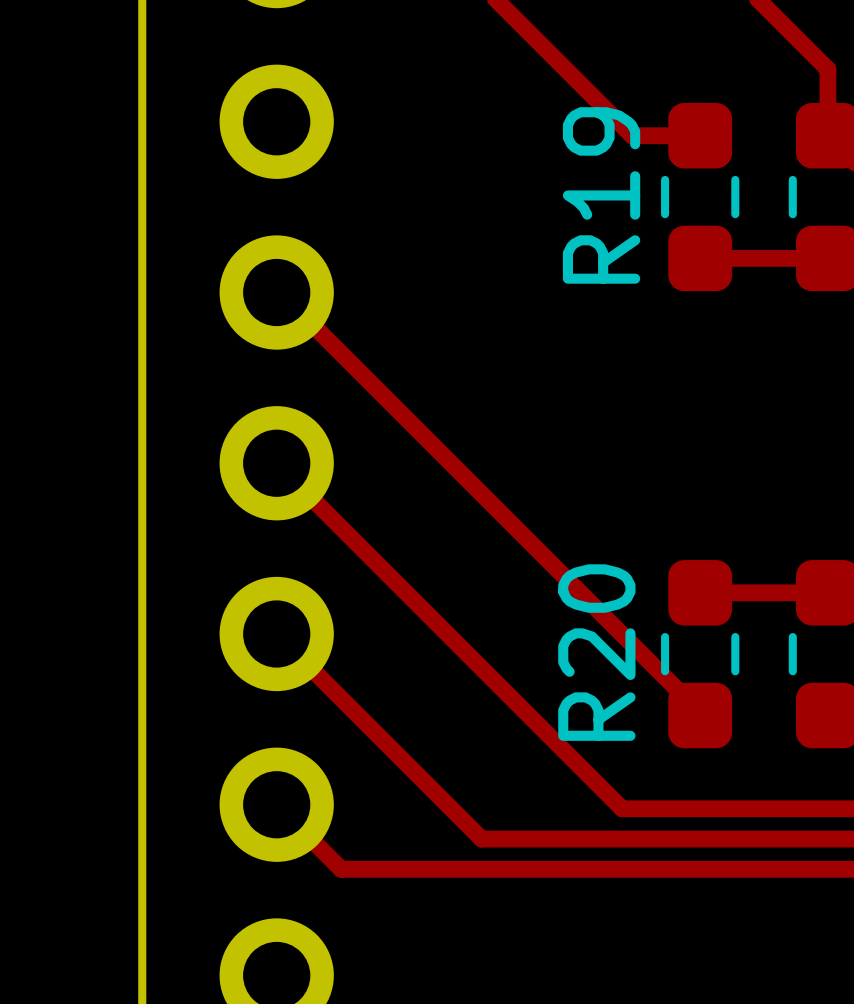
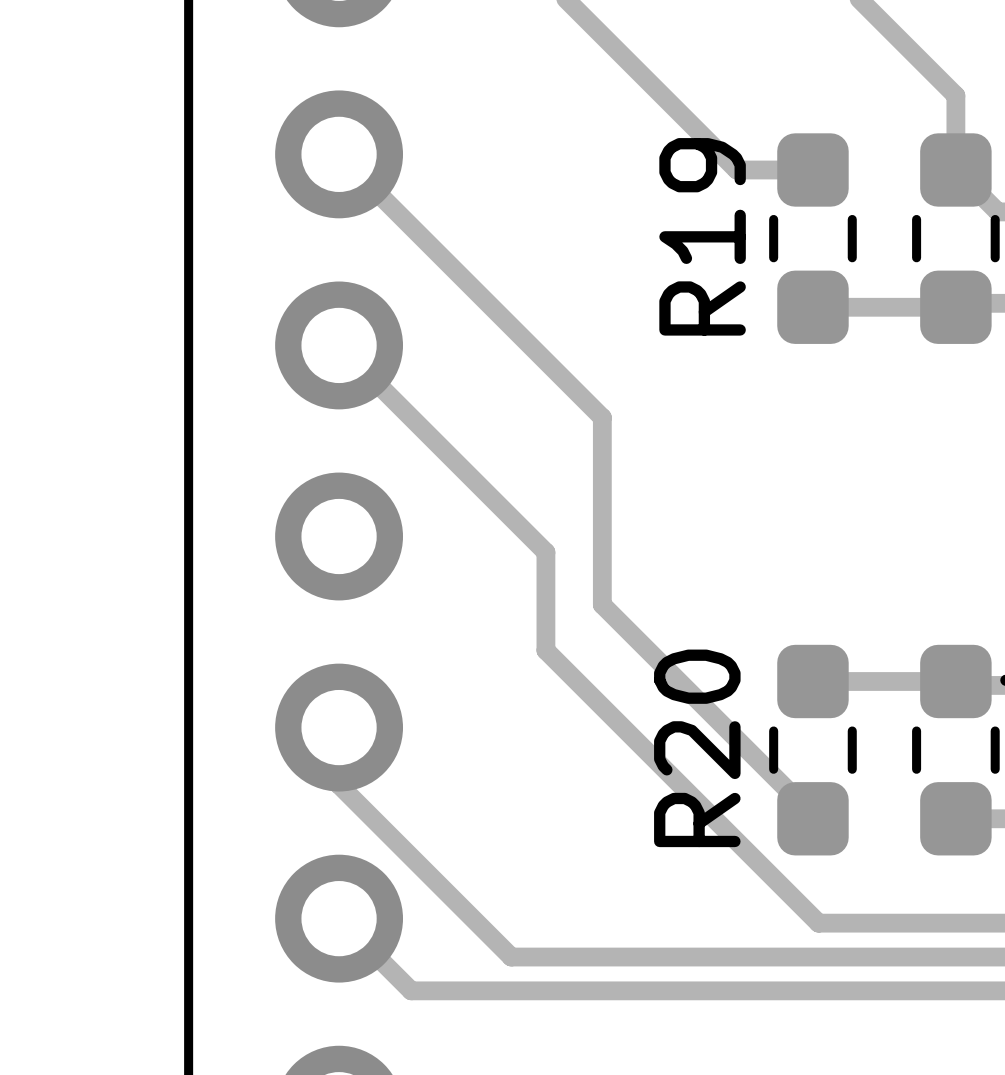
track: (276, 292) (280, 292) (511, 524) -> (339, 154) (602, 417) (602, 604)
track: (276, 463) (622, 808) (705, 808) -> (339, 345) (545, 552) (545, 650) (818, 923)
track: (276, 634) (481, 839) -> (339, 727) (339, 784) (511, 957) (568, 957)

